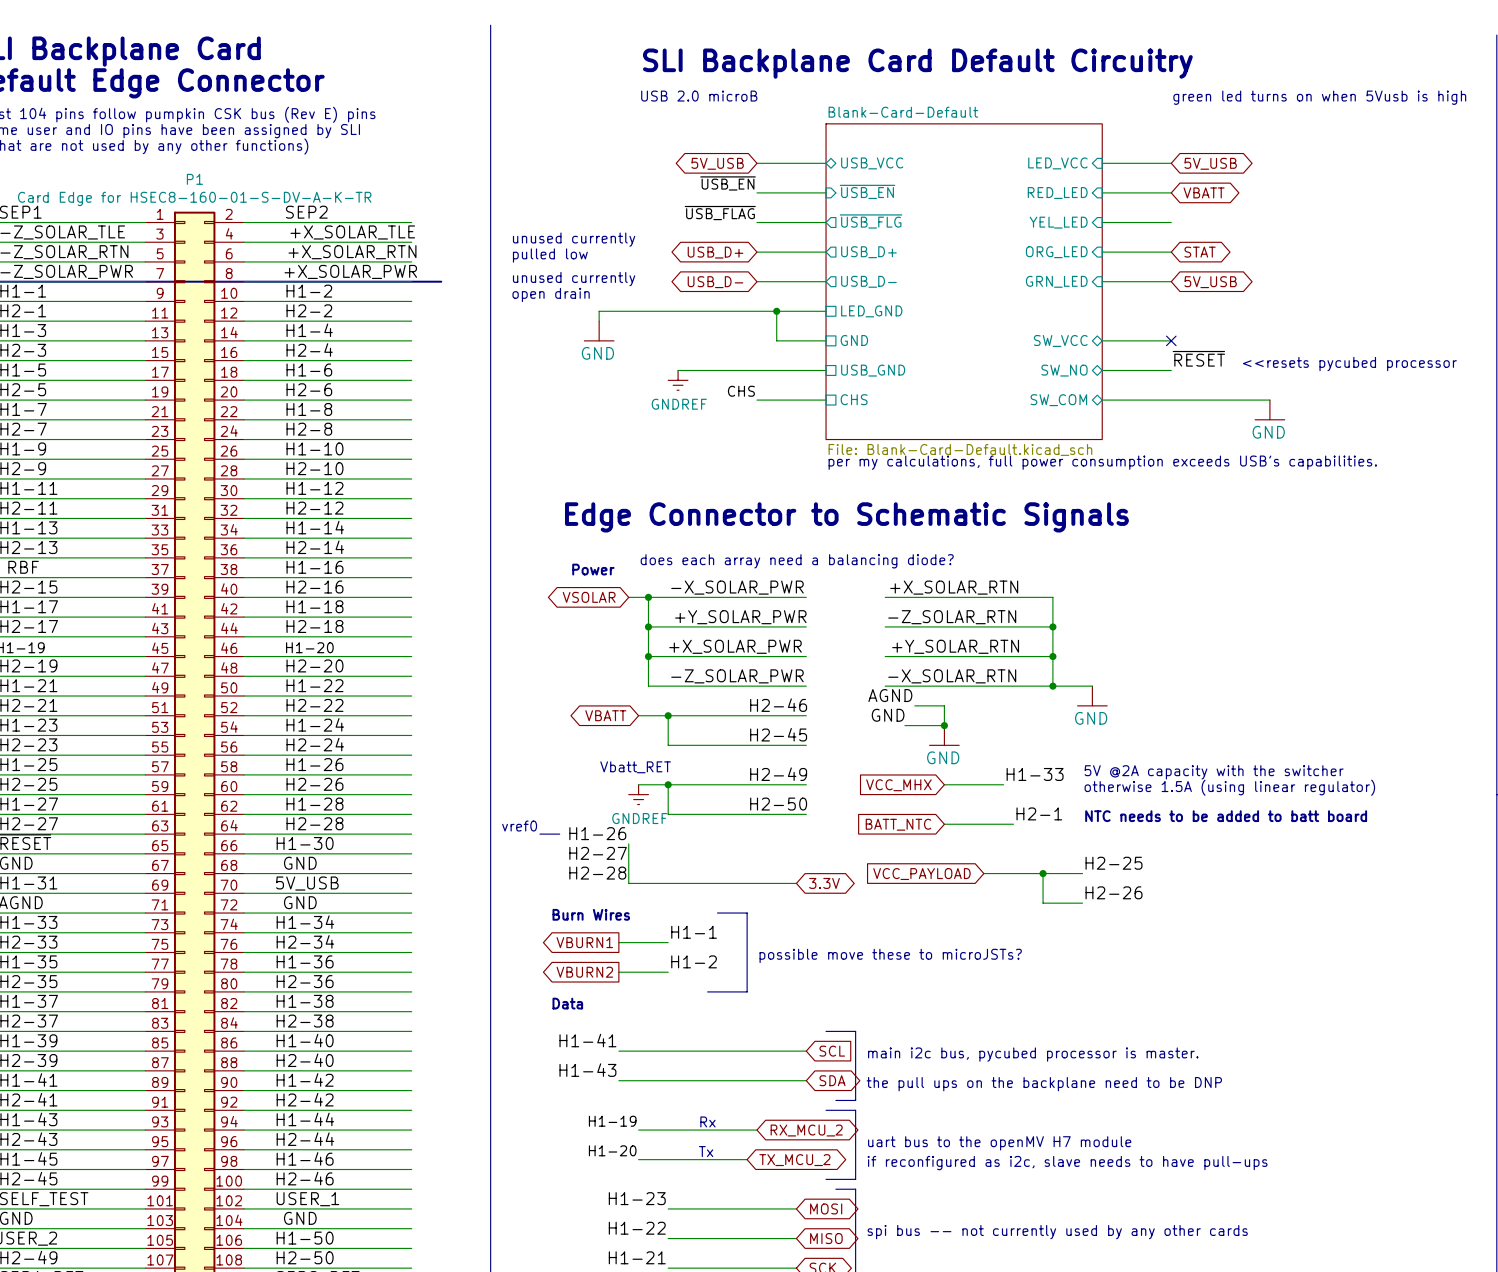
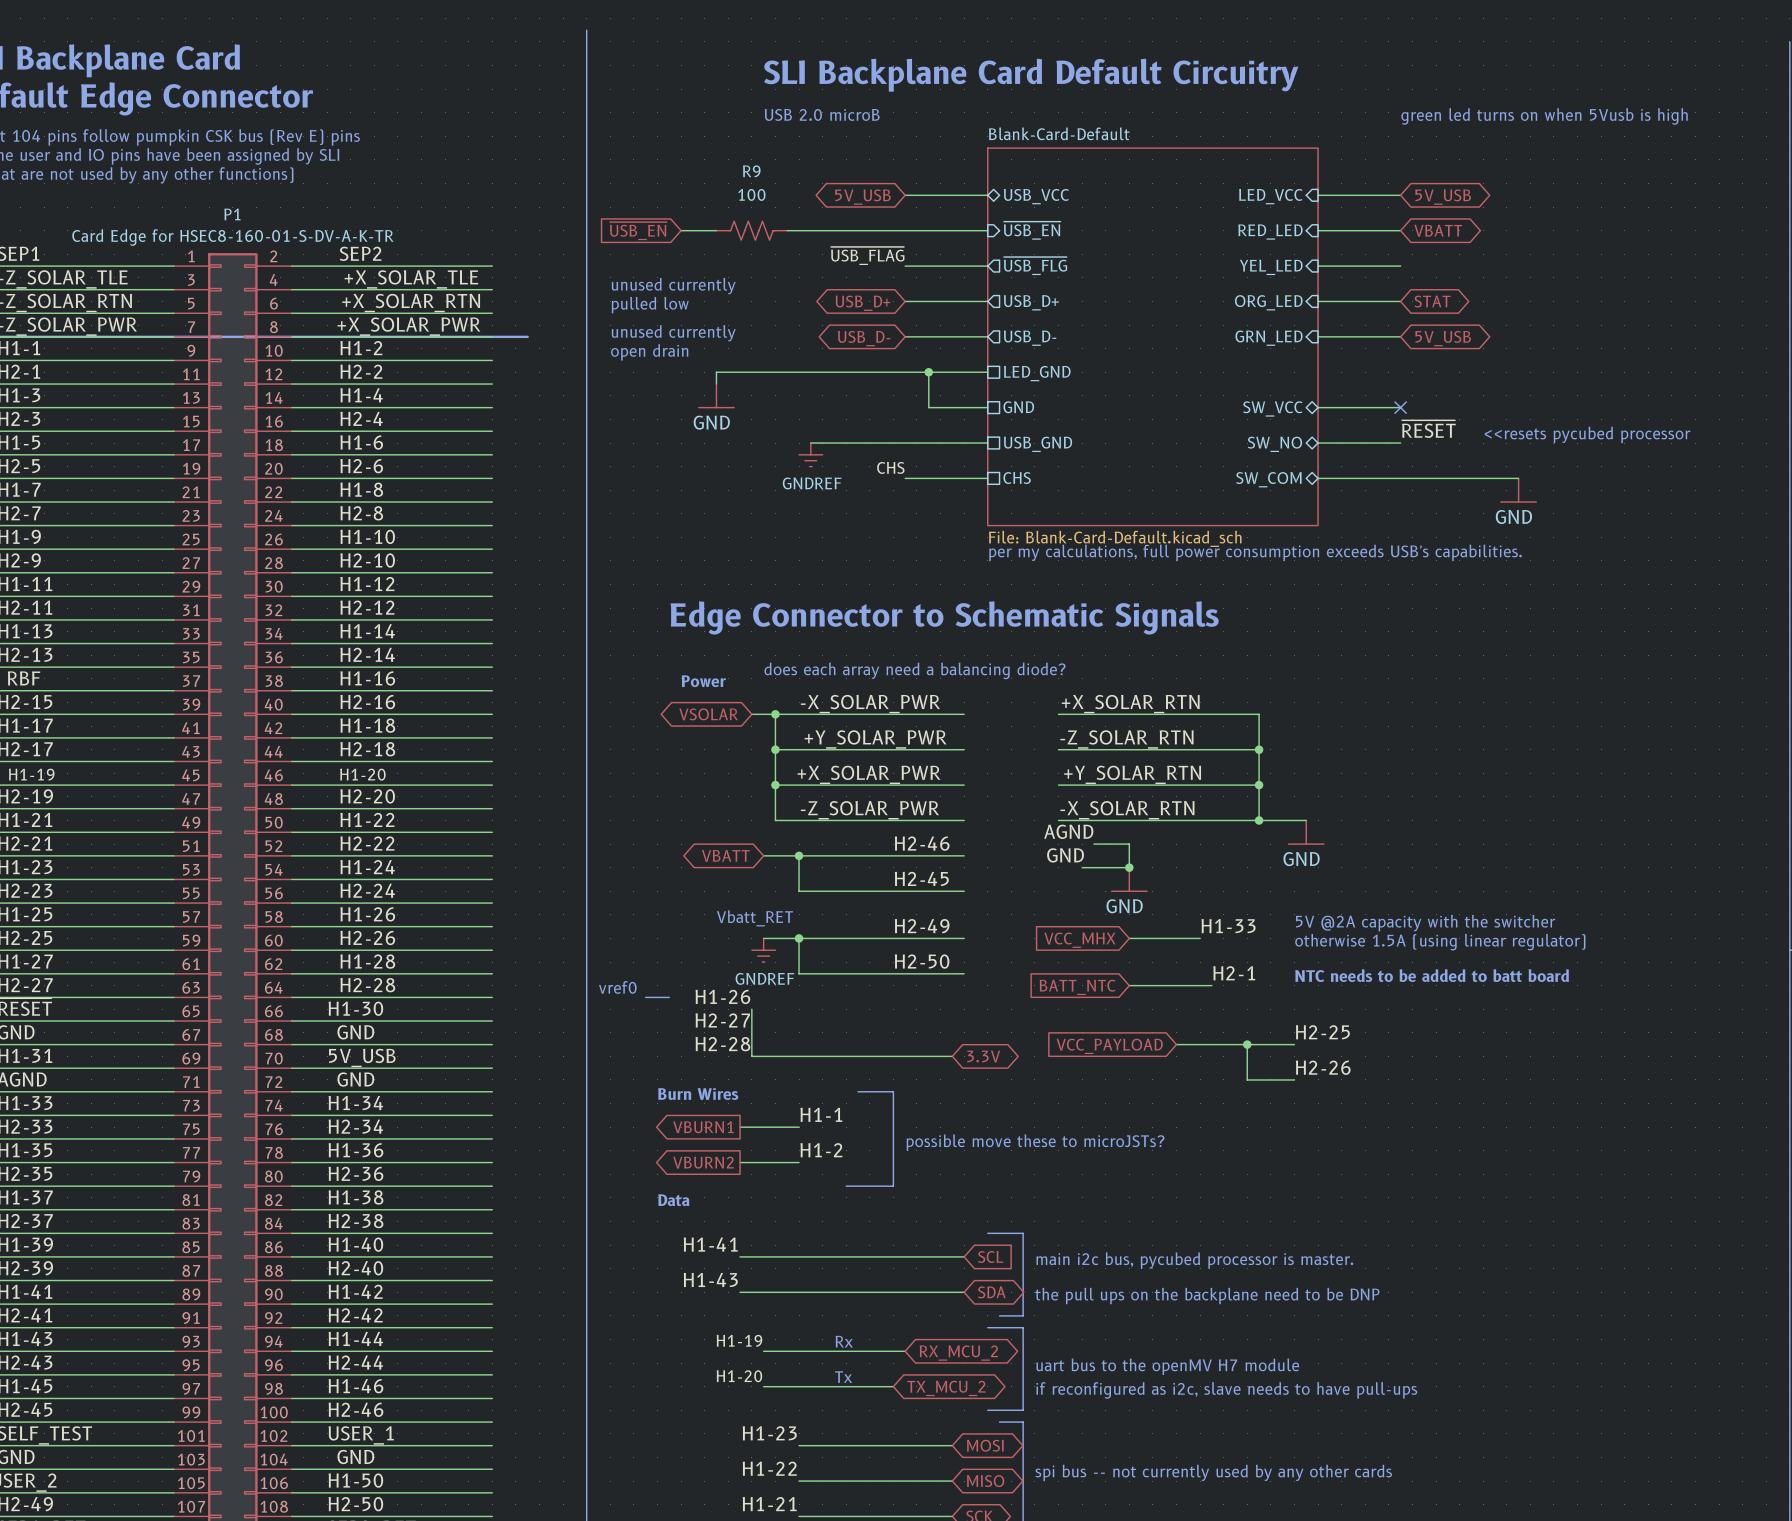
label: ~{USB_EN} (728, 183) -> none
global label: none -> ~{USB_EN} (638, 231)
wire: none -> (681, 230) (716, 230)
R9: none -> 100 (751, 230)
wire: none -> (787, 230) (905, 230)

